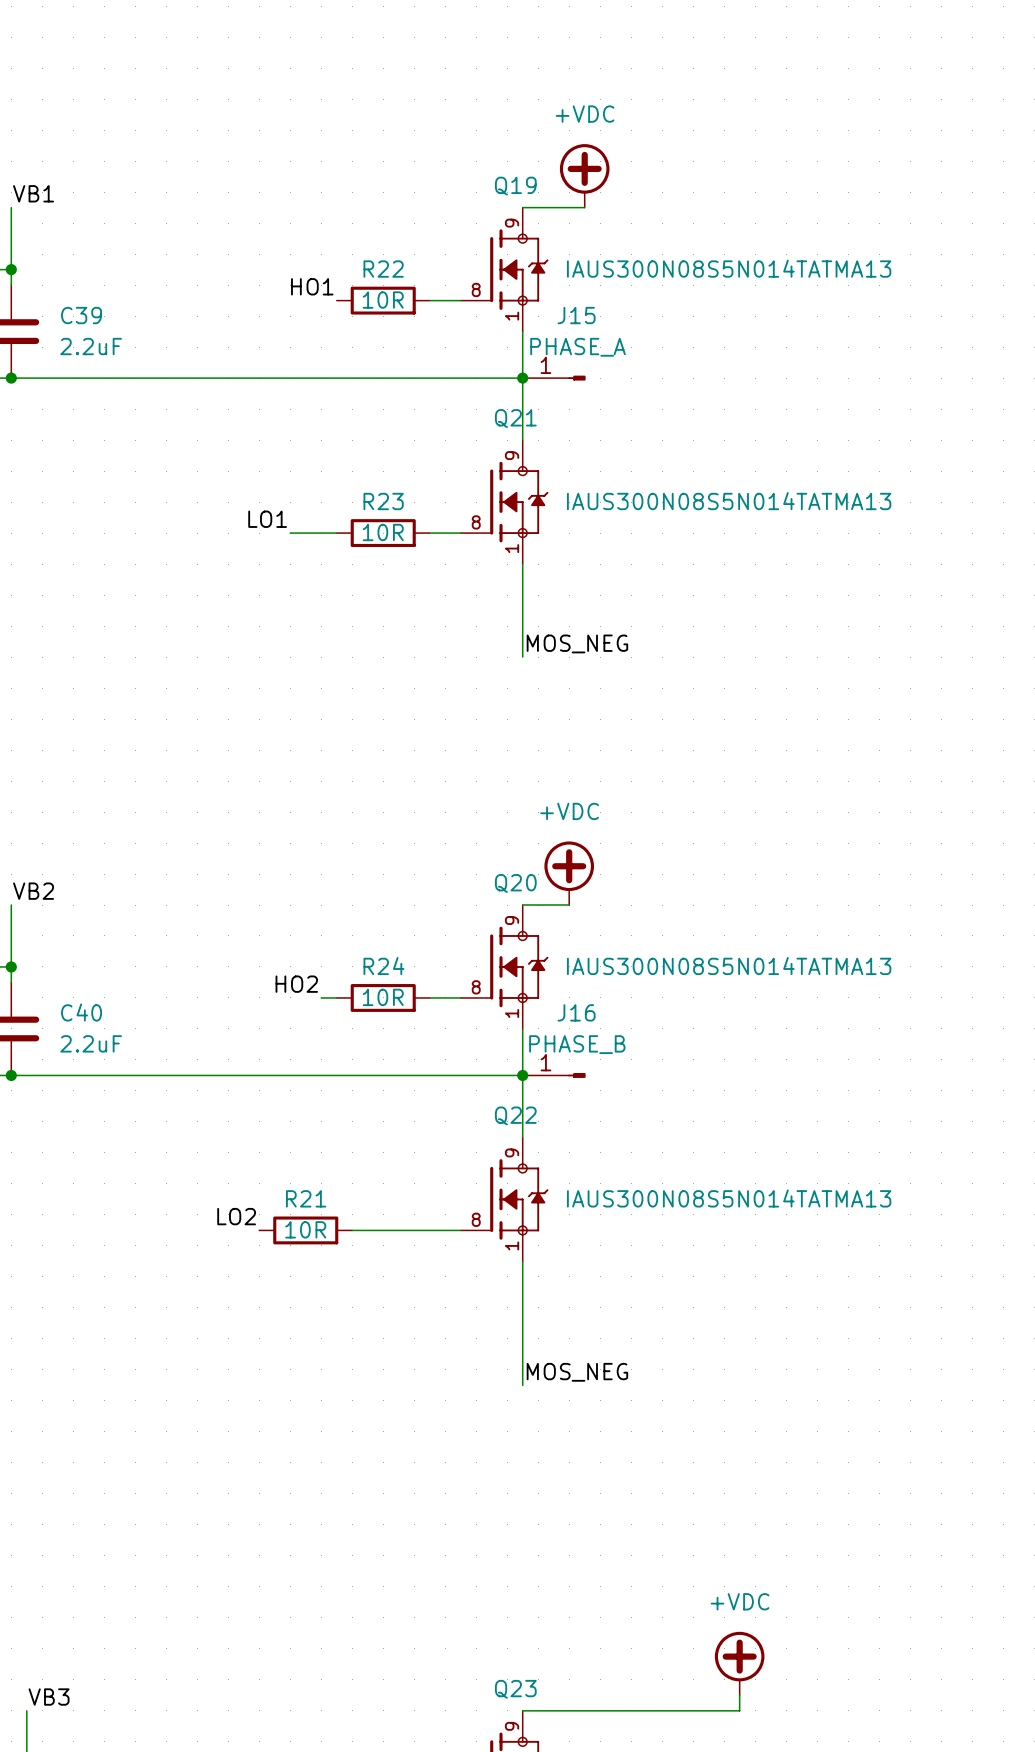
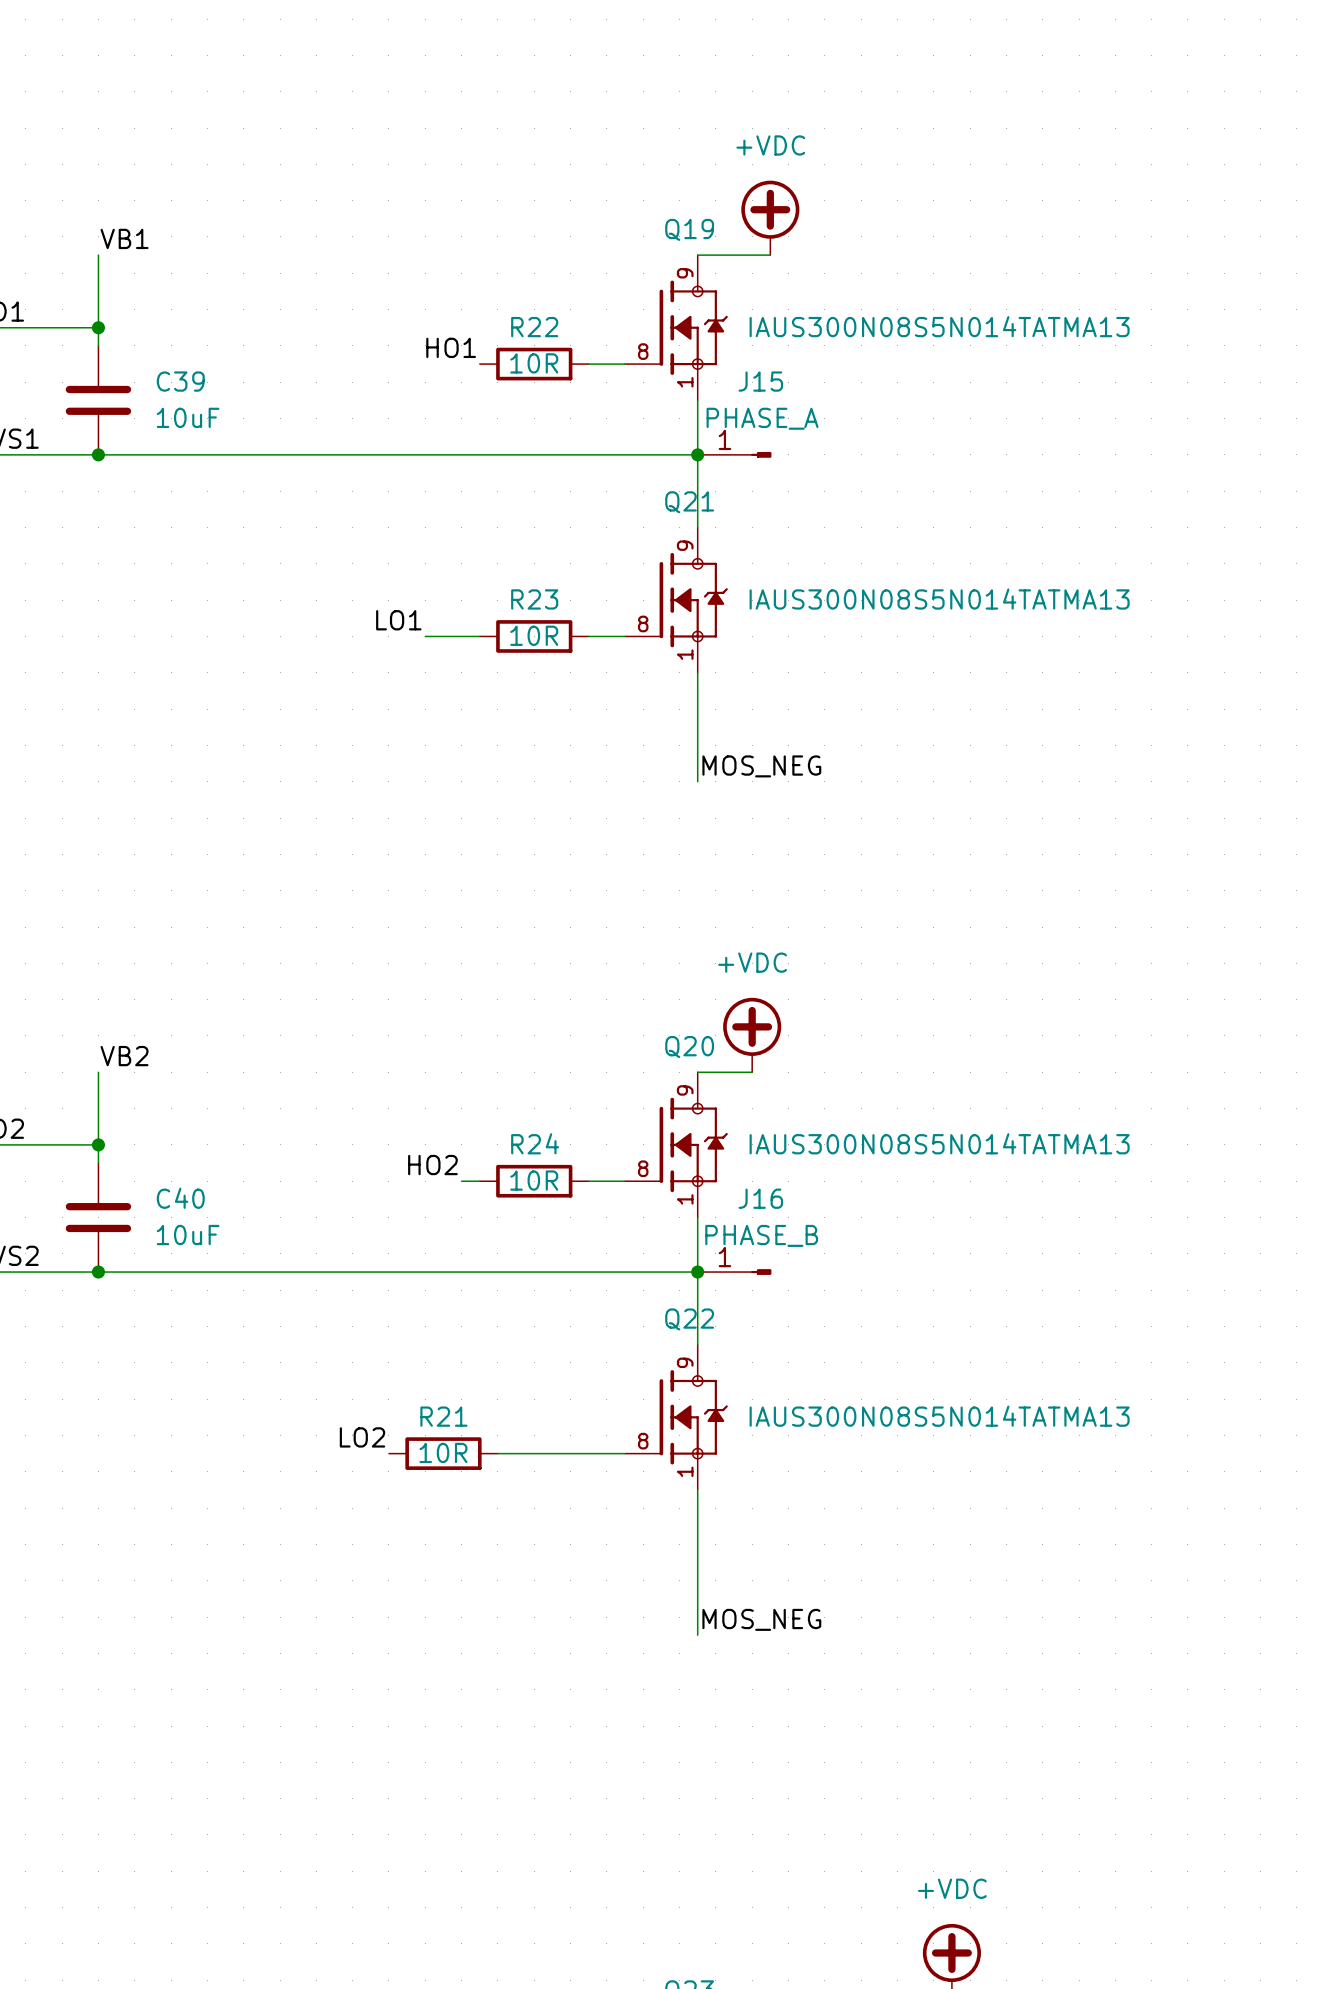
C39 value: 2.2uF (91, 346) -> 10uF (188, 417)
C40 value: 2.2uF (91, 1043) -> 10uF (188, 1235)

